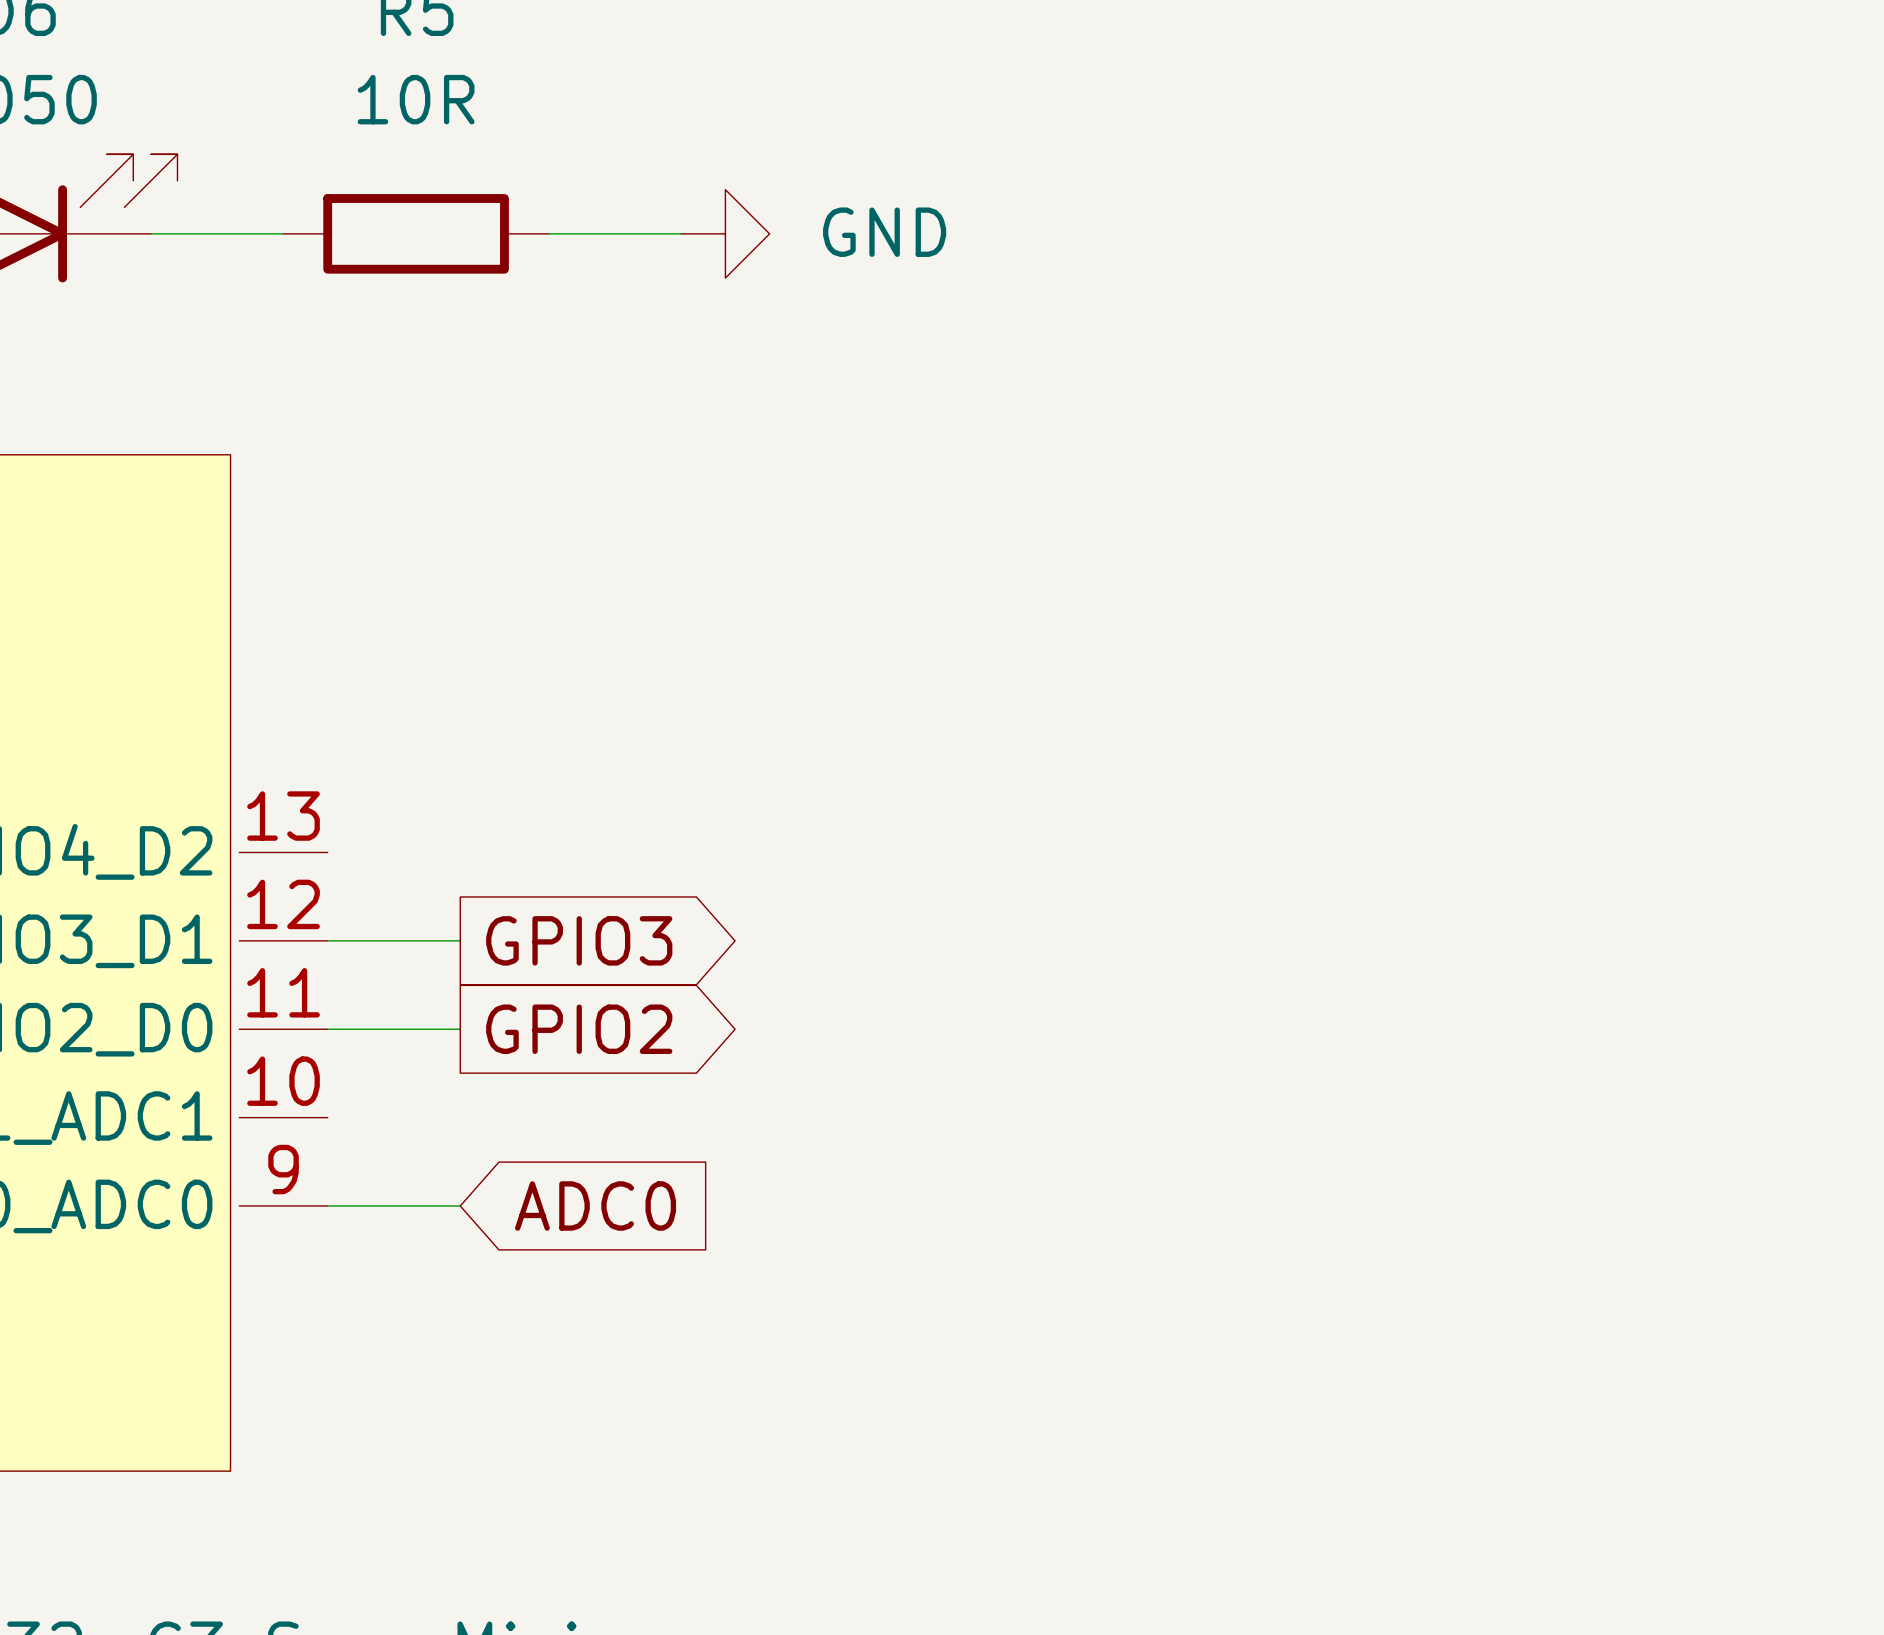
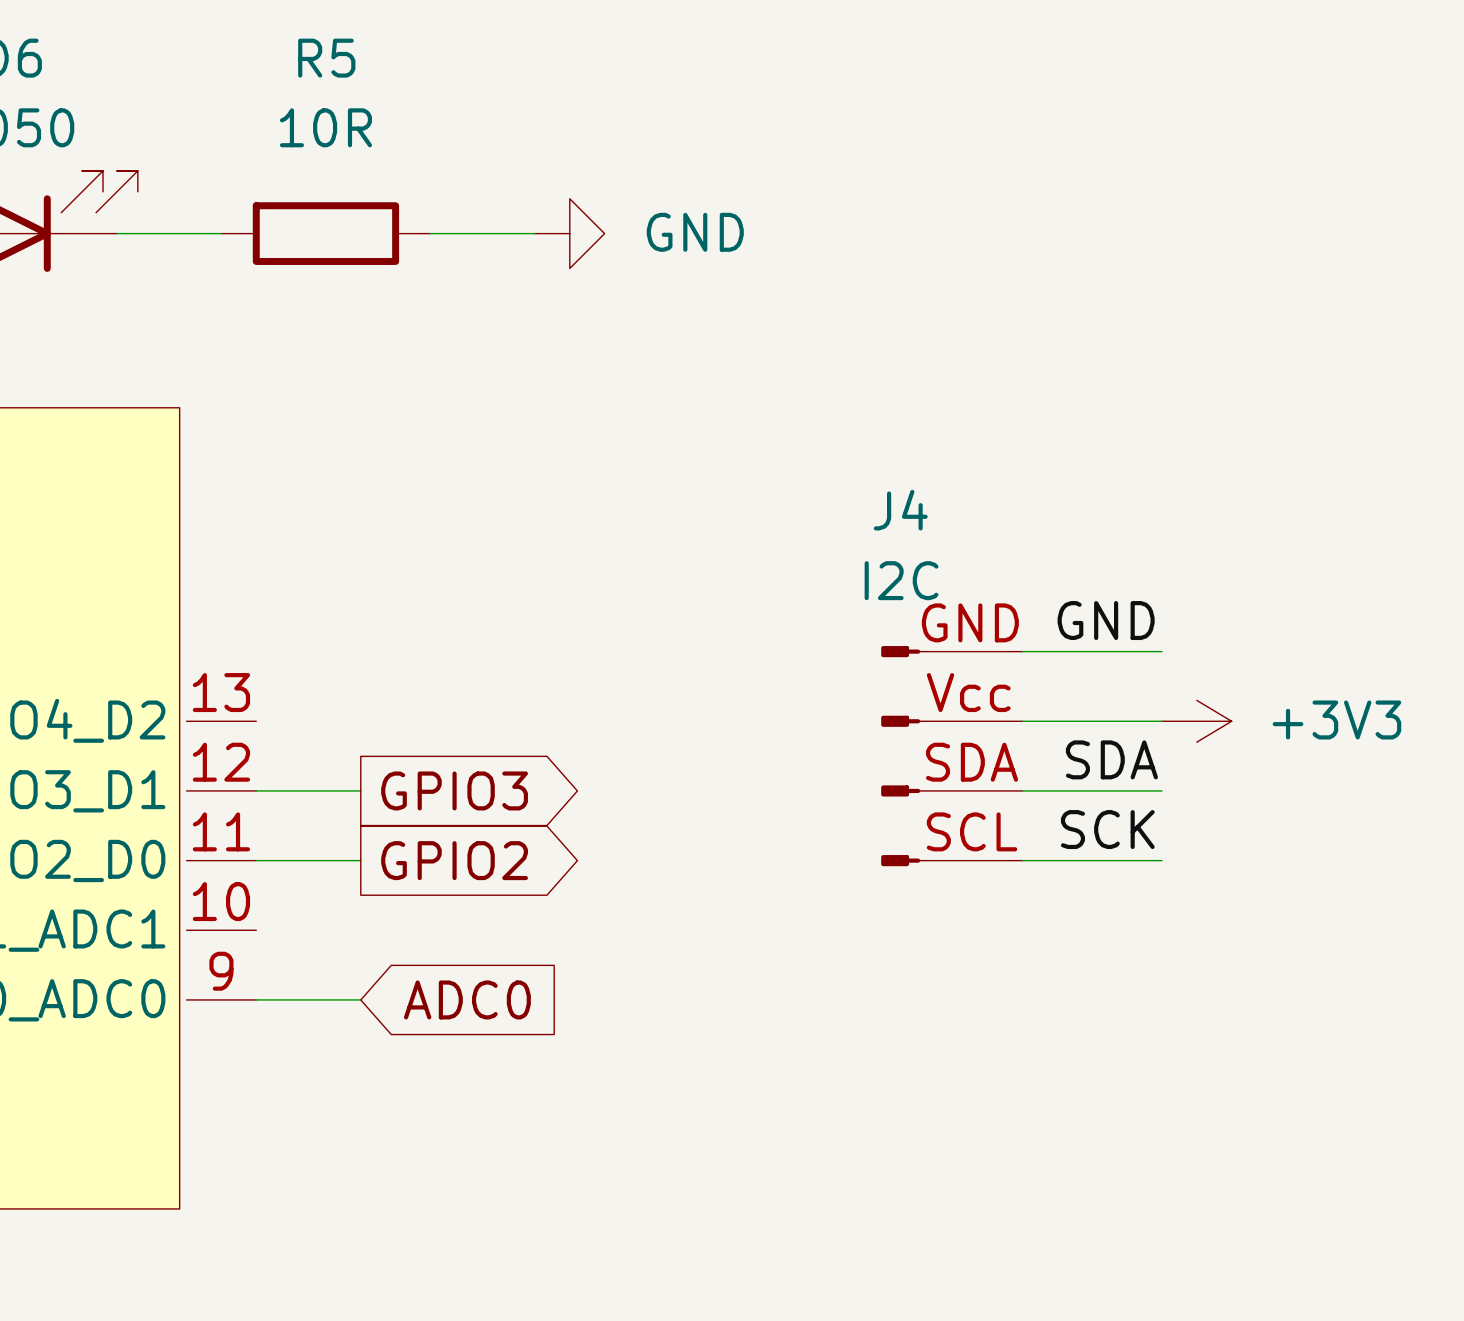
label: none -> GND (1106, 620)
wire: none -> (1022, 651) (1161, 651)
wire: none -> (1022, 721) (1161, 721)
power symbol: none -> +3V3 (1196, 721)
J4: none -> I2C (951, 756)
label: none -> SDA (1111, 759)
wire: none -> (1022, 790) (1161, 790)
label: none -> SCK (1107, 829)
wire: none -> (1022, 860) (1161, 860)

